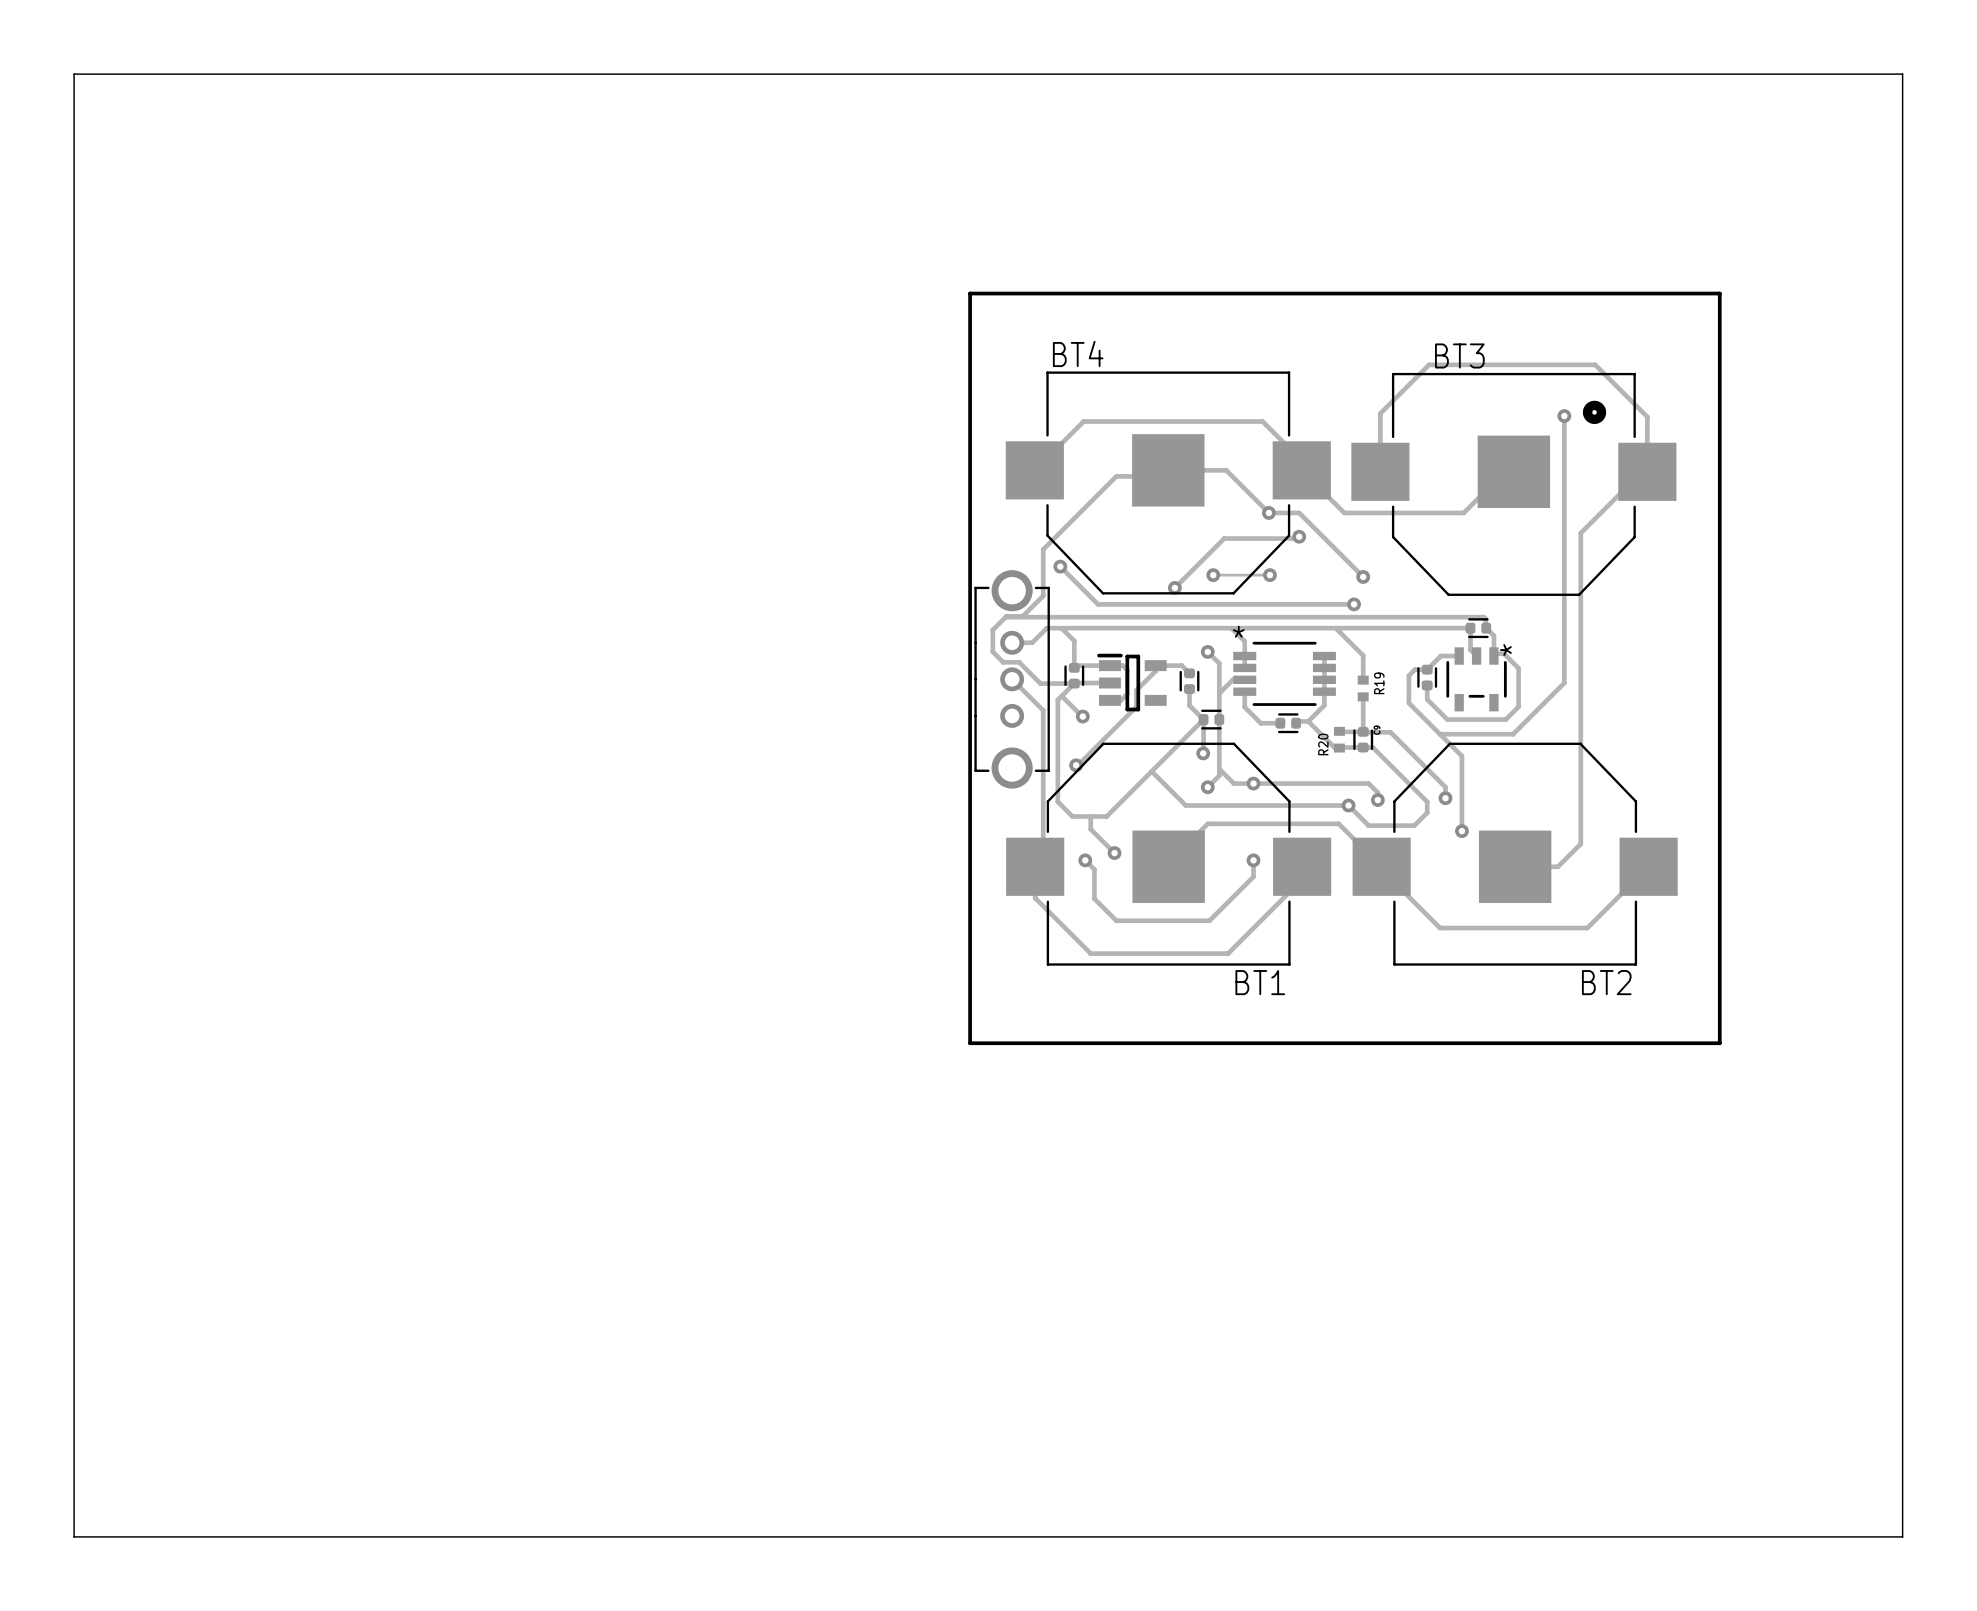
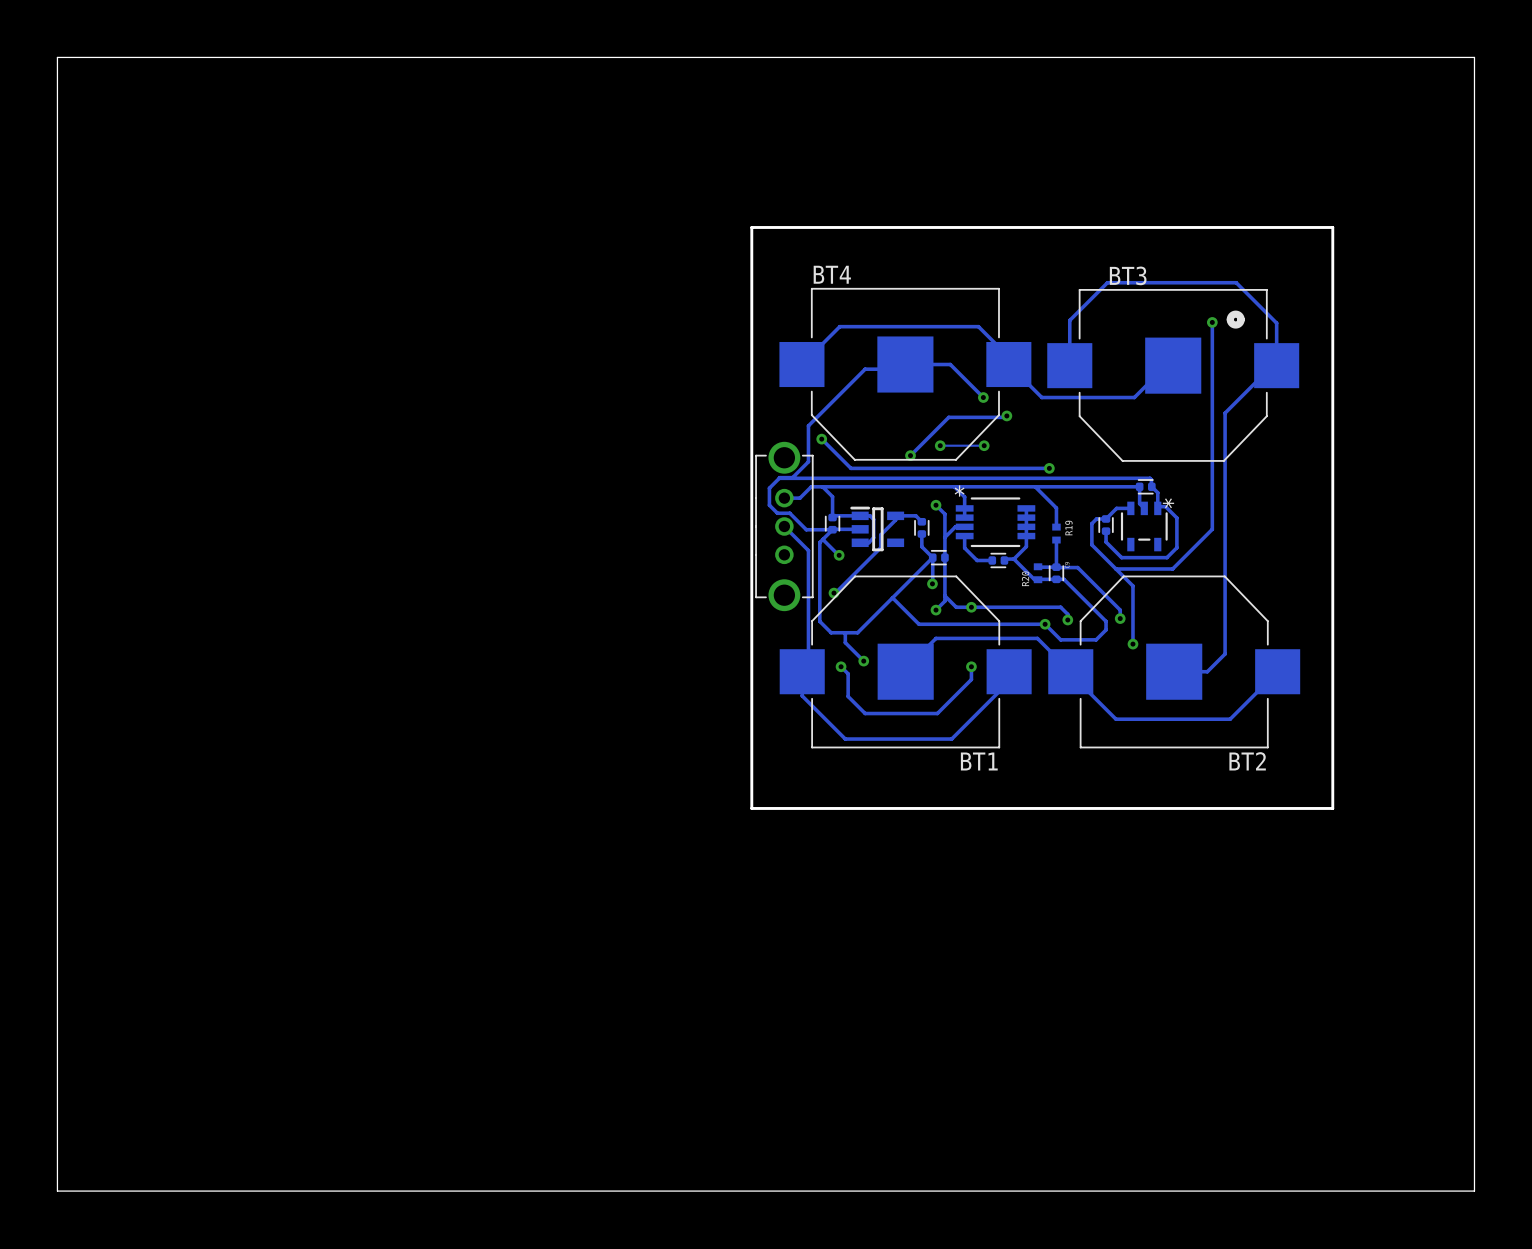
track: (1268, 512) (1299, 512) (1363, 576) -> none
via: (1363, 576) -> none

